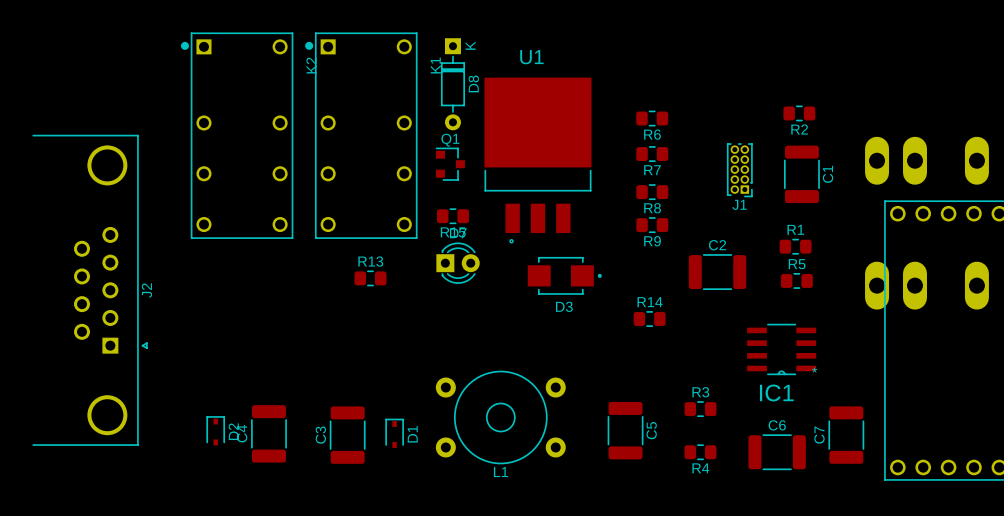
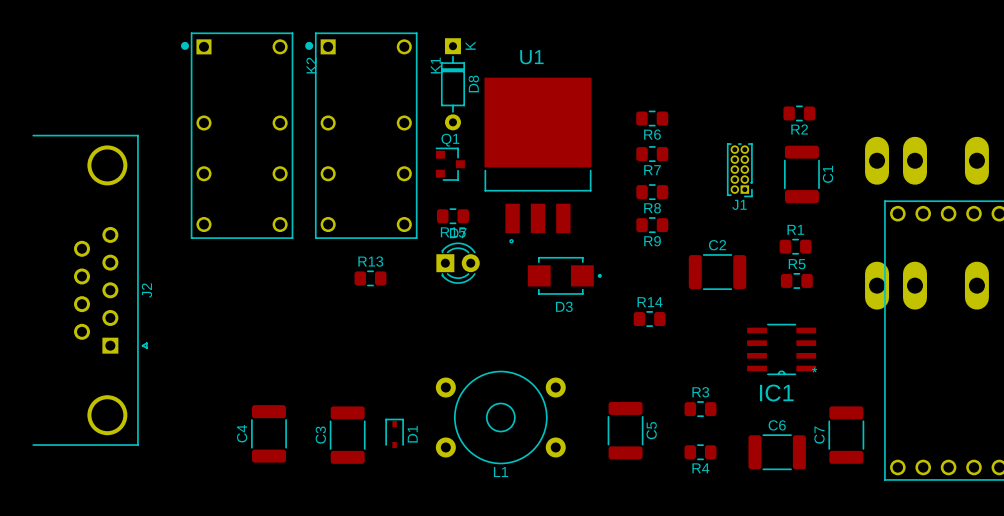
D2: (215, 430) -> none

